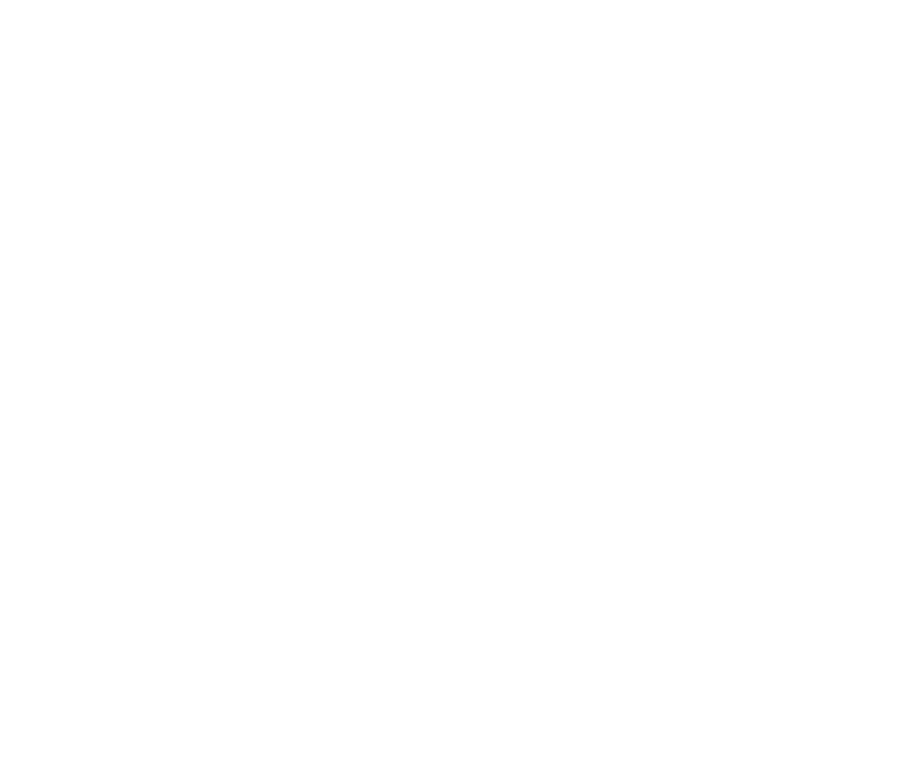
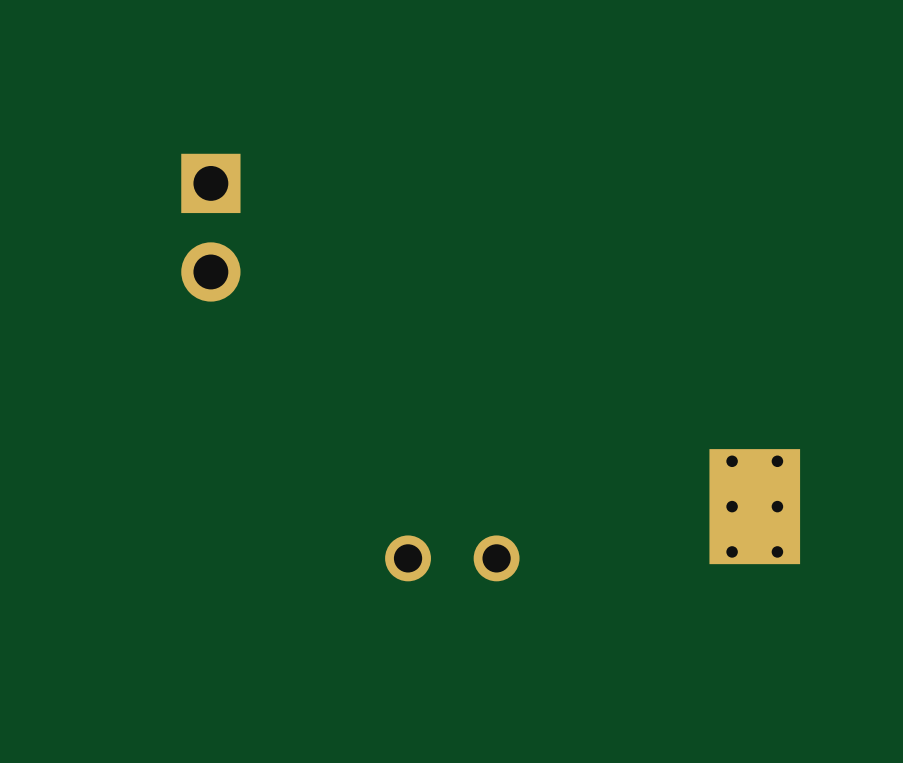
part: none -> (210, 227)
part: none -> (754, 506)
part: none -> (452, 558)

